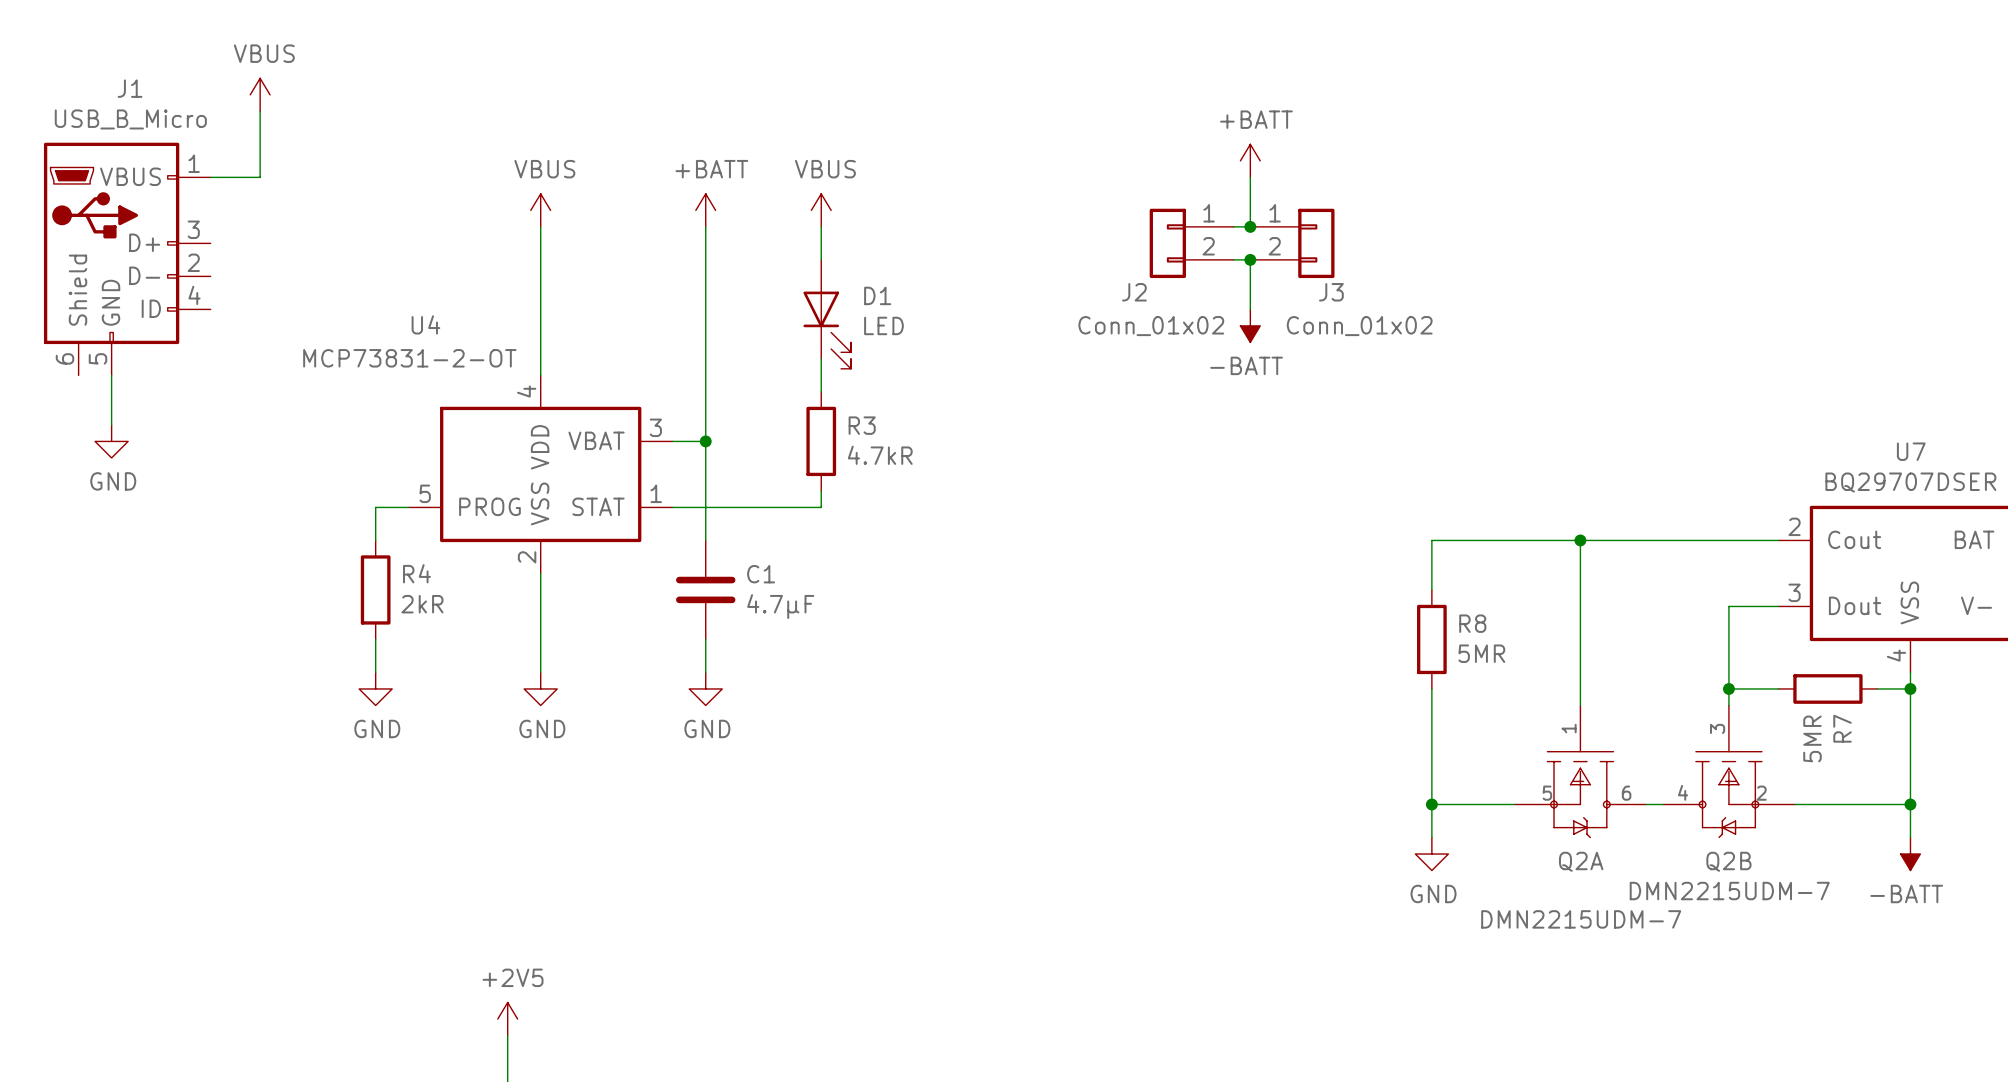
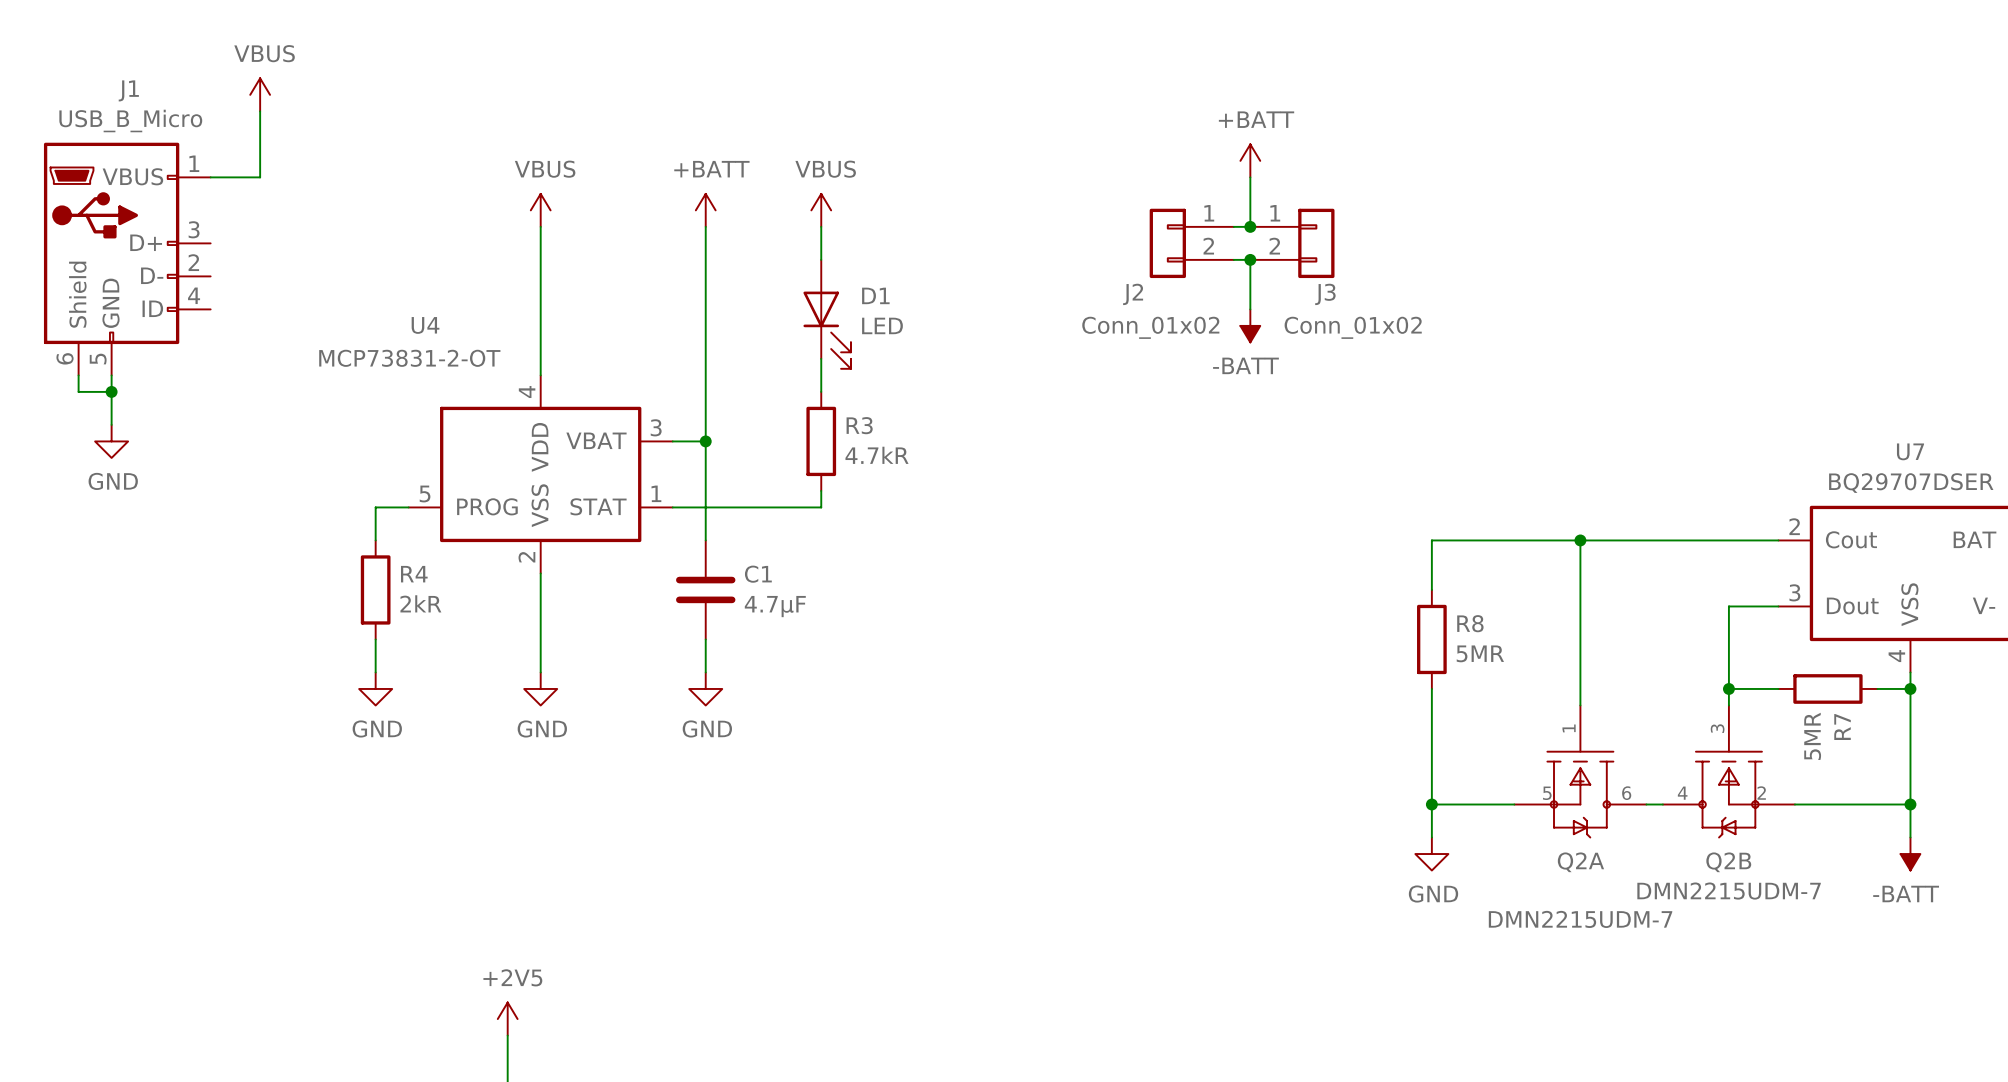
wire: none -> (78, 375) (78, 391) (111, 391)
junction: none -> (111, 391)

